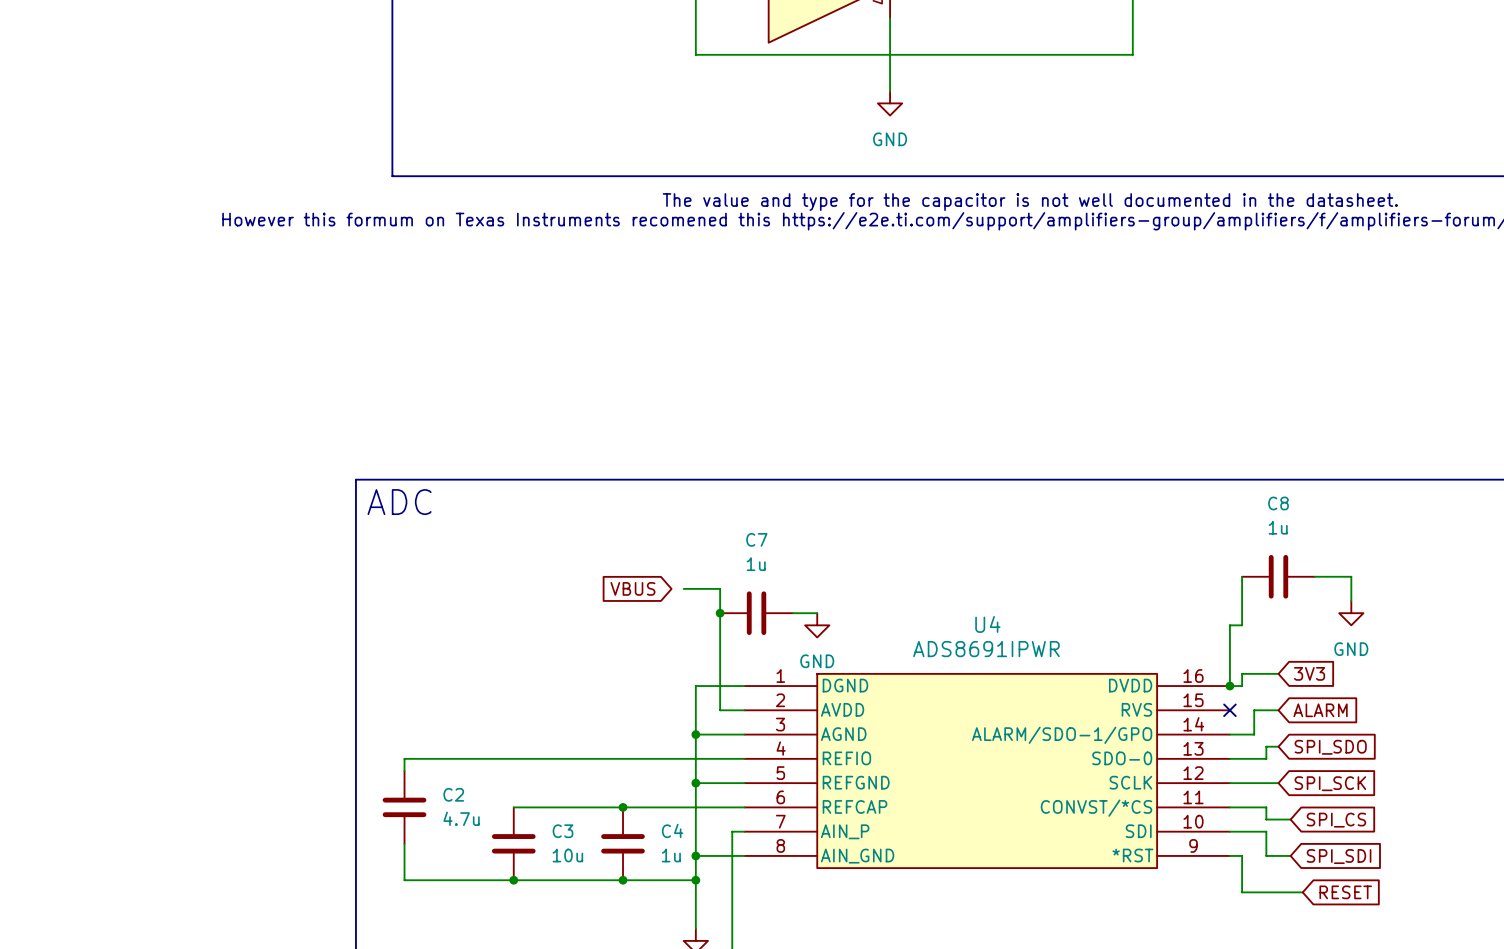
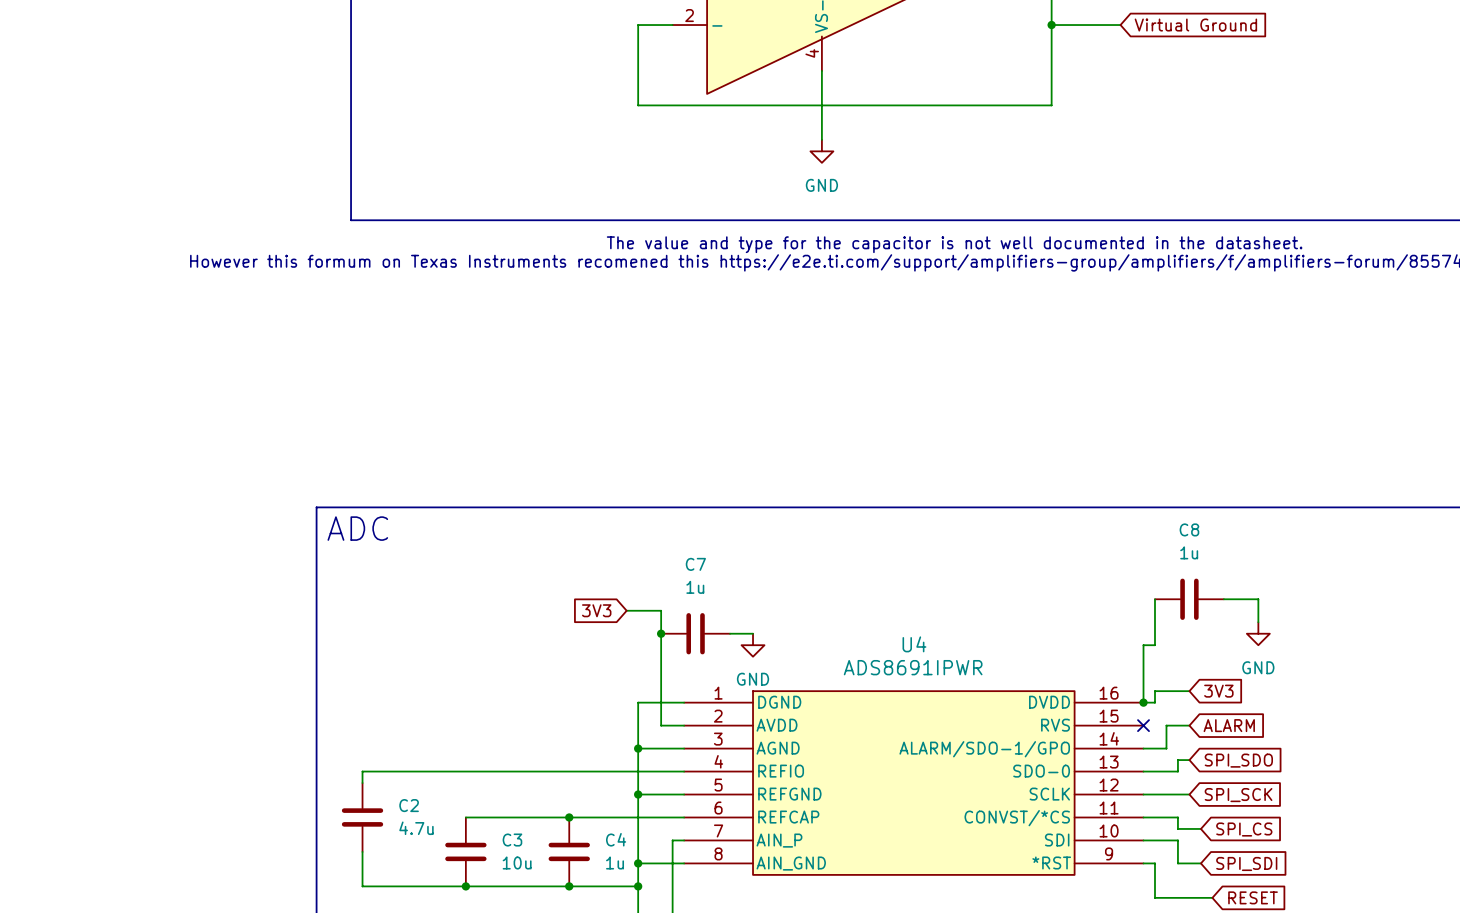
global label: VBUS (632, 588) -> none
global label: none -> 3V3 (596, 610)

